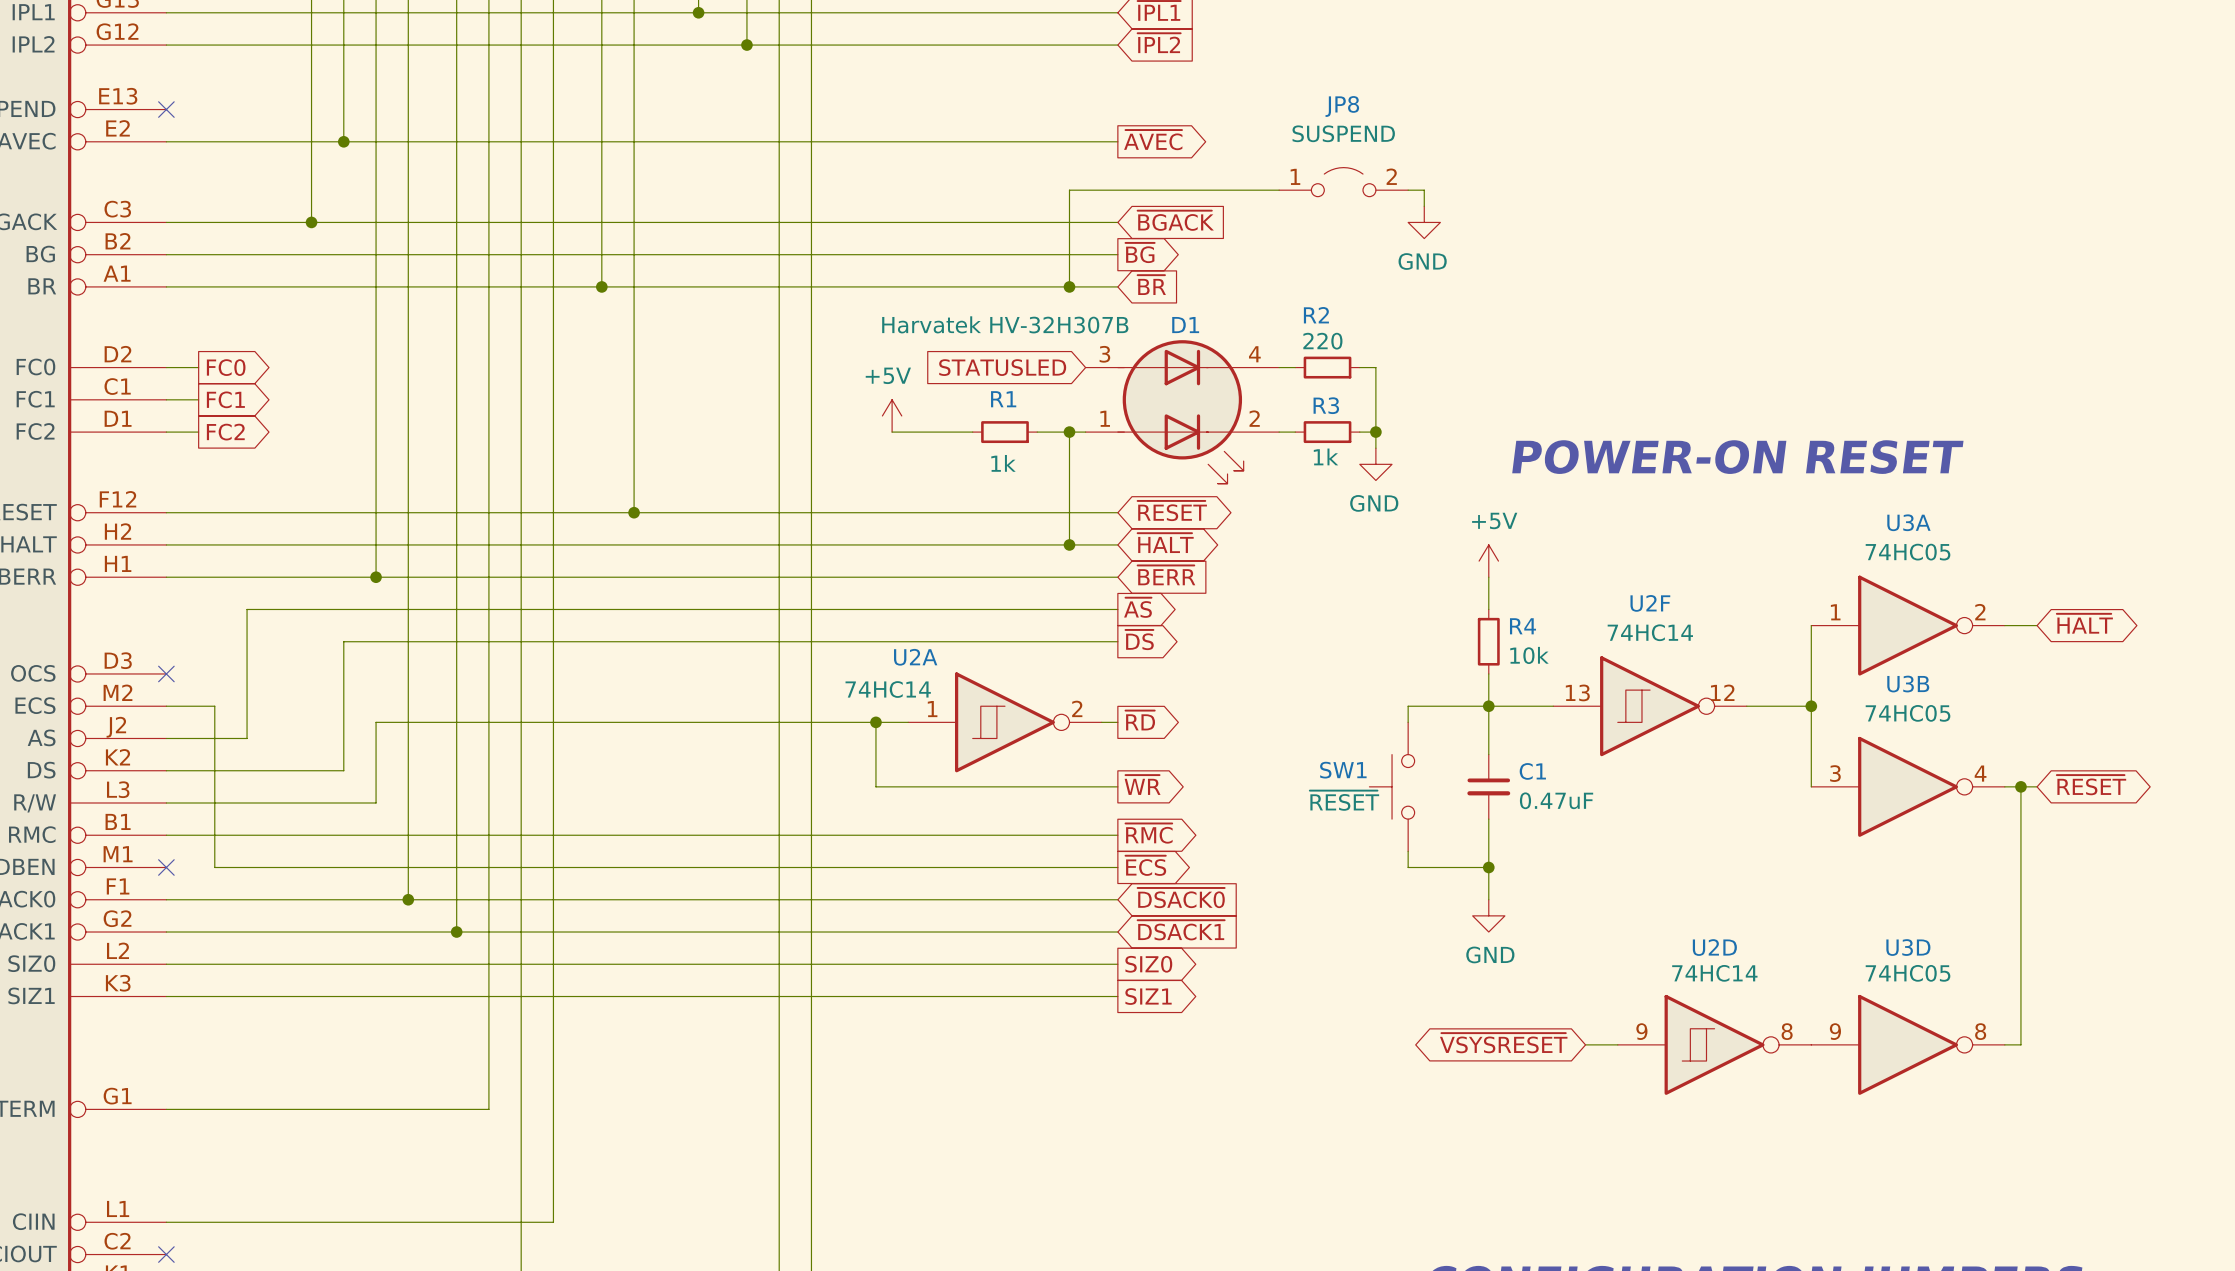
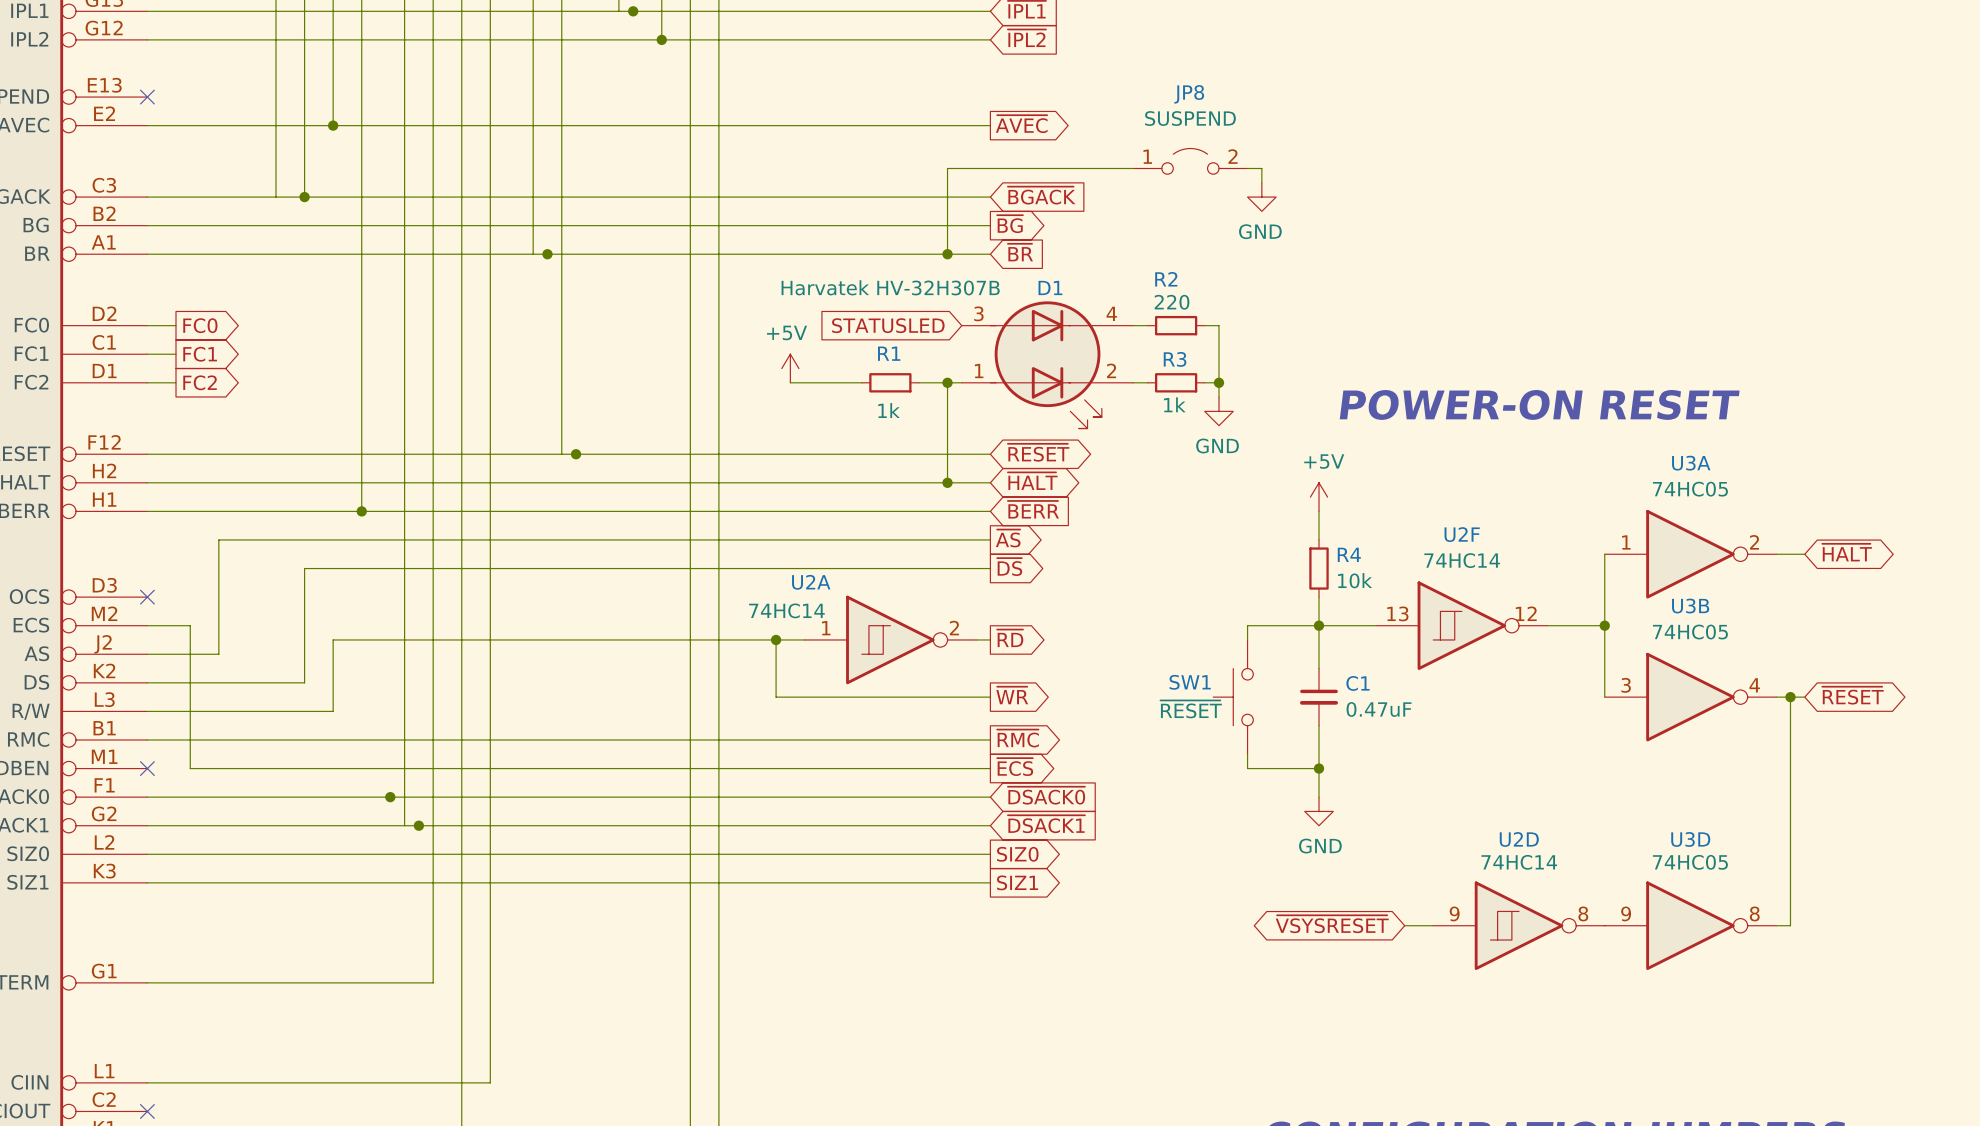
junction position: (698, 12) -> (633, 11)
wire: none -> (304, 125) (304, 197)
junction position: (343, 141) -> (333, 125)
wire: (376, 141) (376, 577) -> none
junction position: (311, 222) -> (304, 197)
junction position: (601, 286) -> (547, 254)
junction position: (634, 512) -> (576, 454)
junction position: (376, 577) -> (361, 511)
wire: (408, 577) (408, 899) -> none
junction: (408, 899) -> none
junction: none -> (390, 797)
junction position: (456, 932) -> (418, 825)

